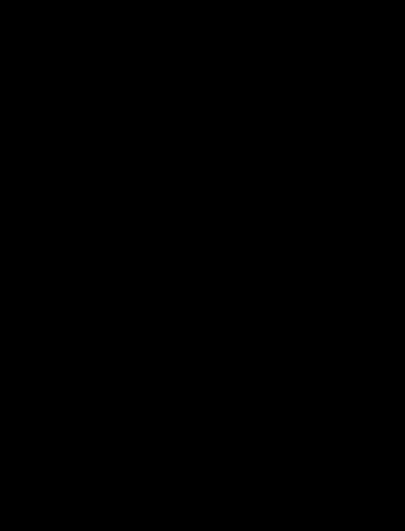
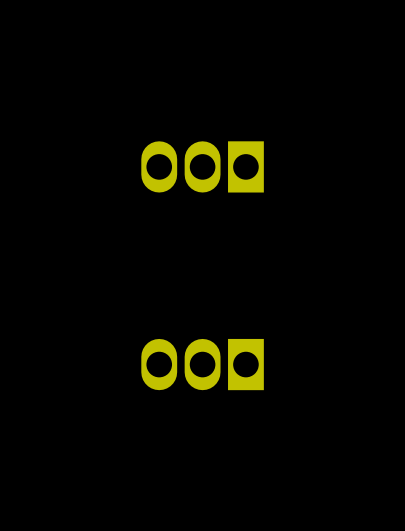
part: none -> (202, 166)
part: none -> (202, 364)

